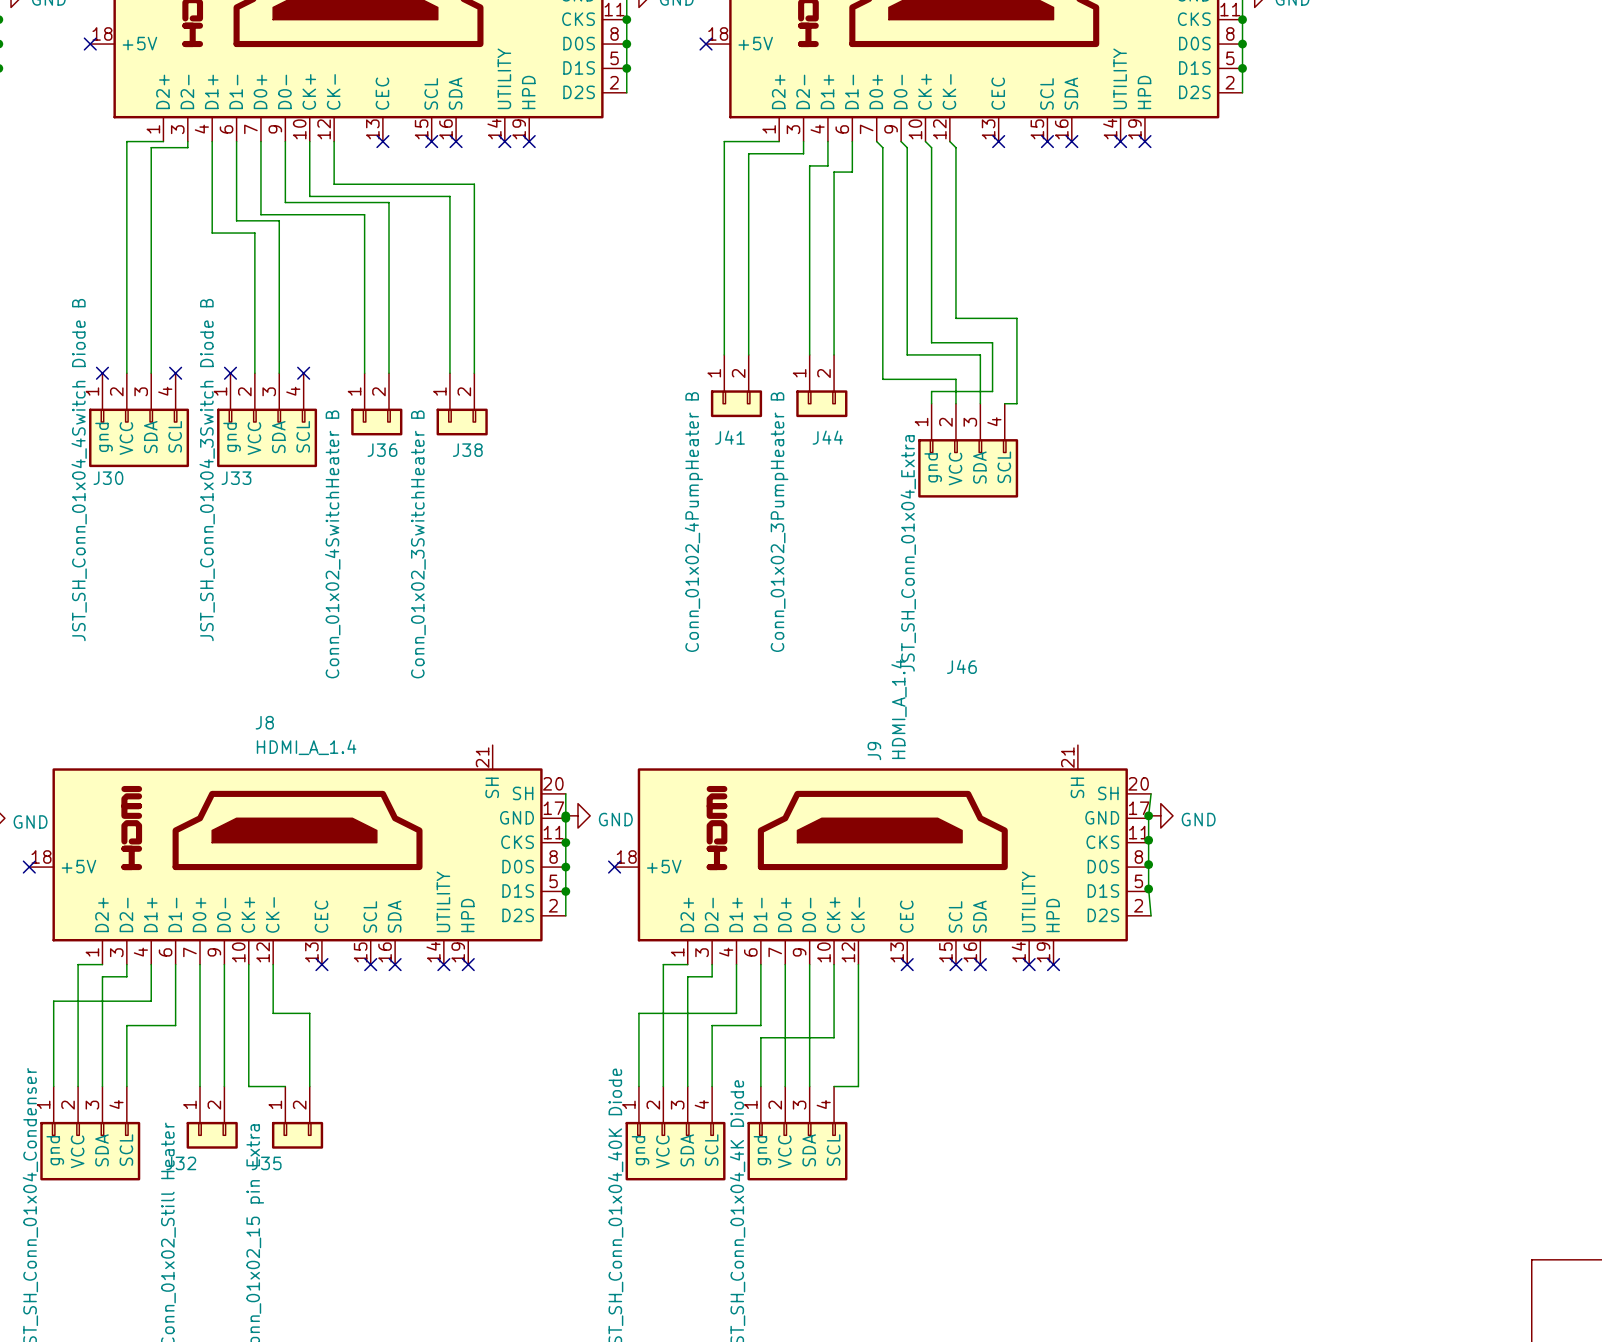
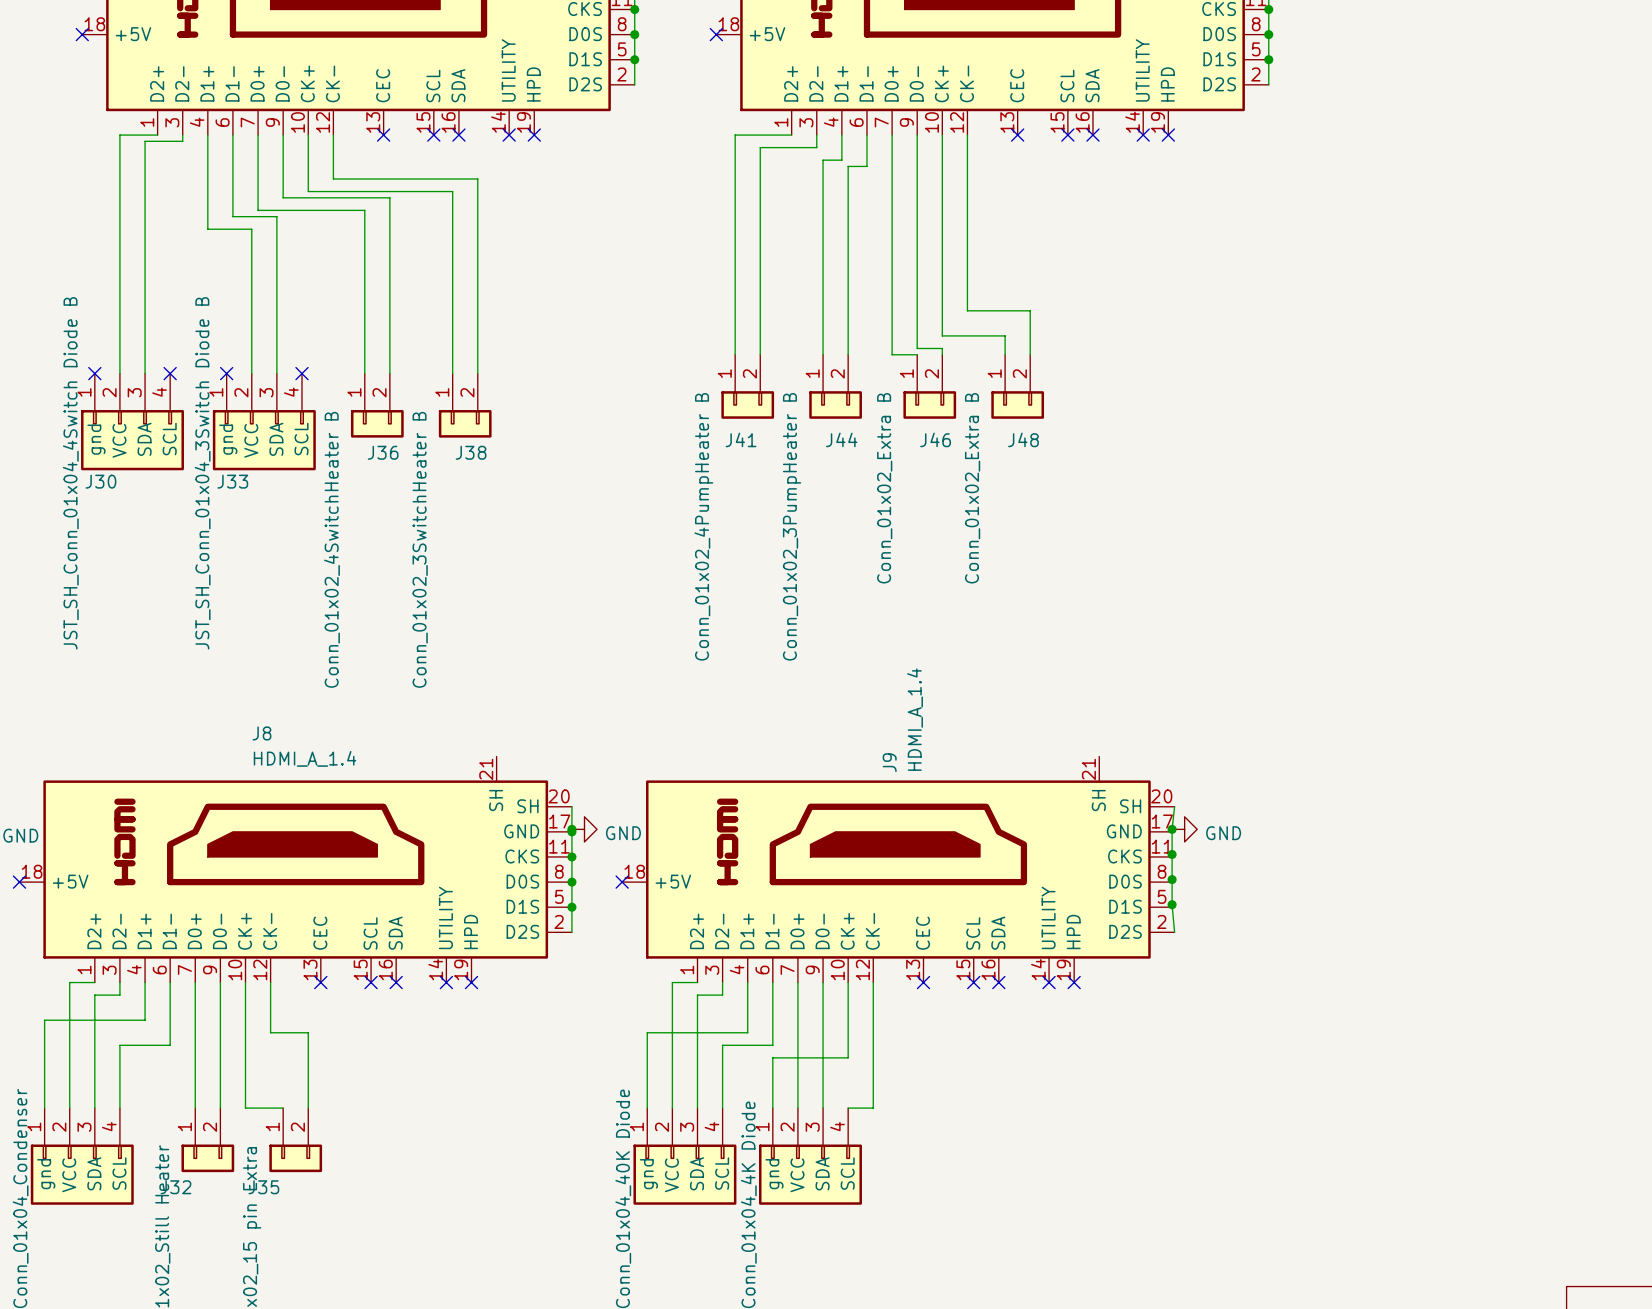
wire: (876, 141) (882, 147) (882, 379) (955, 379) (955, 403) -> (892, 135) (892, 354) (917, 354)
wire: (901, 141) (907, 147) (907, 354) (980, 354) (980, 403) -> (917, 135) (917, 348) (942, 348) (942, 354)
wire: (925, 141) (931, 147) (931, 342) (992, 342) (992, 391) (931, 391) (931, 403) -> (942, 135) (942, 335) (1005, 335) (1005, 354)
wire: (949, 141) (955, 147) (955, 318) (1016, 318) (1016, 403) (1004, 403) -> (967, 135) (967, 310) (1030, 310) (1030, 354)
J48: none -> Conn_01x02_Extra B (1017, 386)
J46 symbol: [918, 403, 1019, 498] -> [903, 354, 957, 419]
J46 value: JST_SH_Conn_01x04_Extra (908, 553) -> Conn_01x02_Extra B (884, 488)
J46 name position: J46 (961, 666) -> J46 (935, 439)

